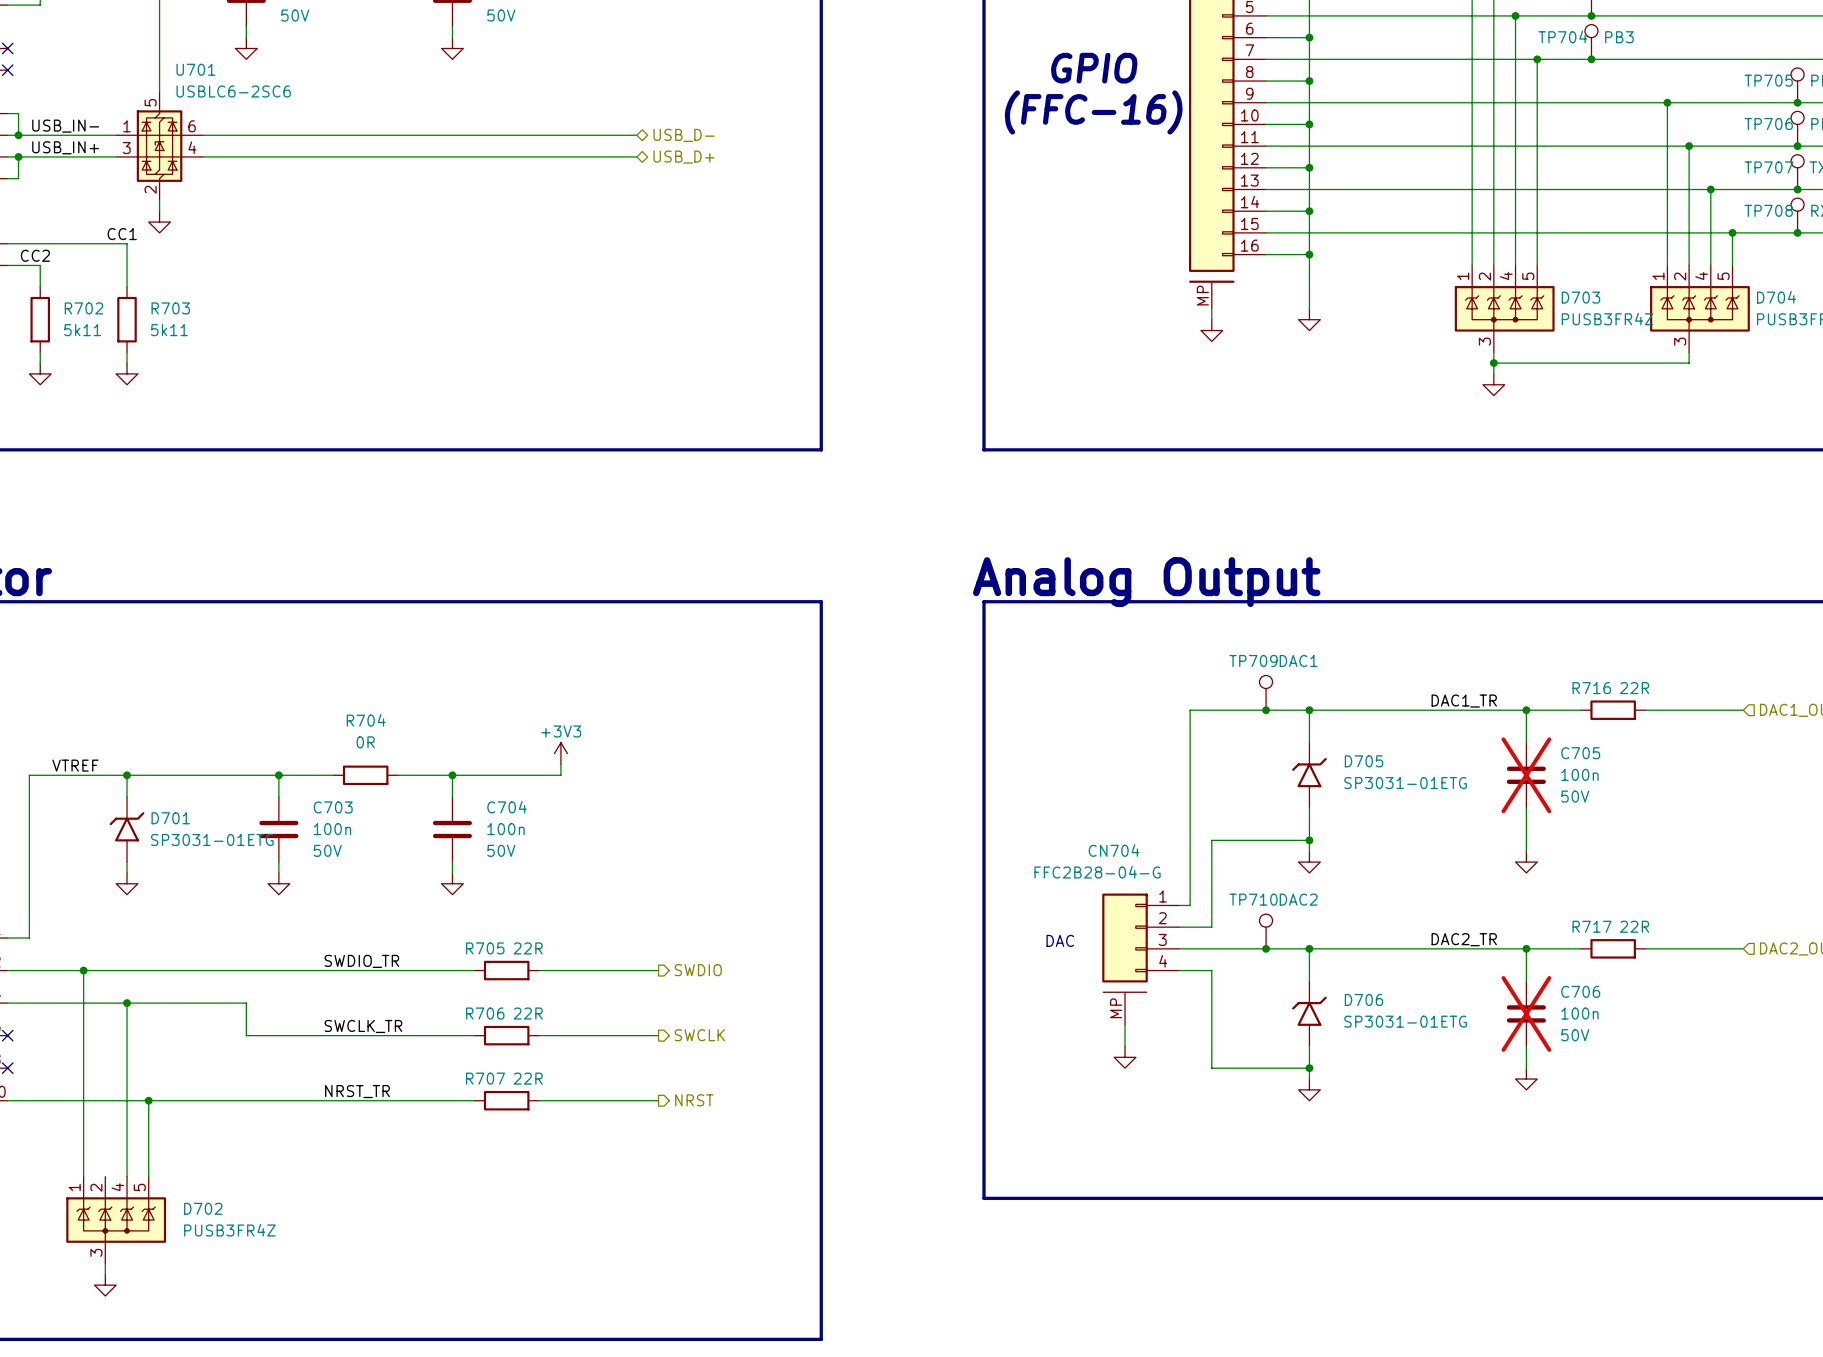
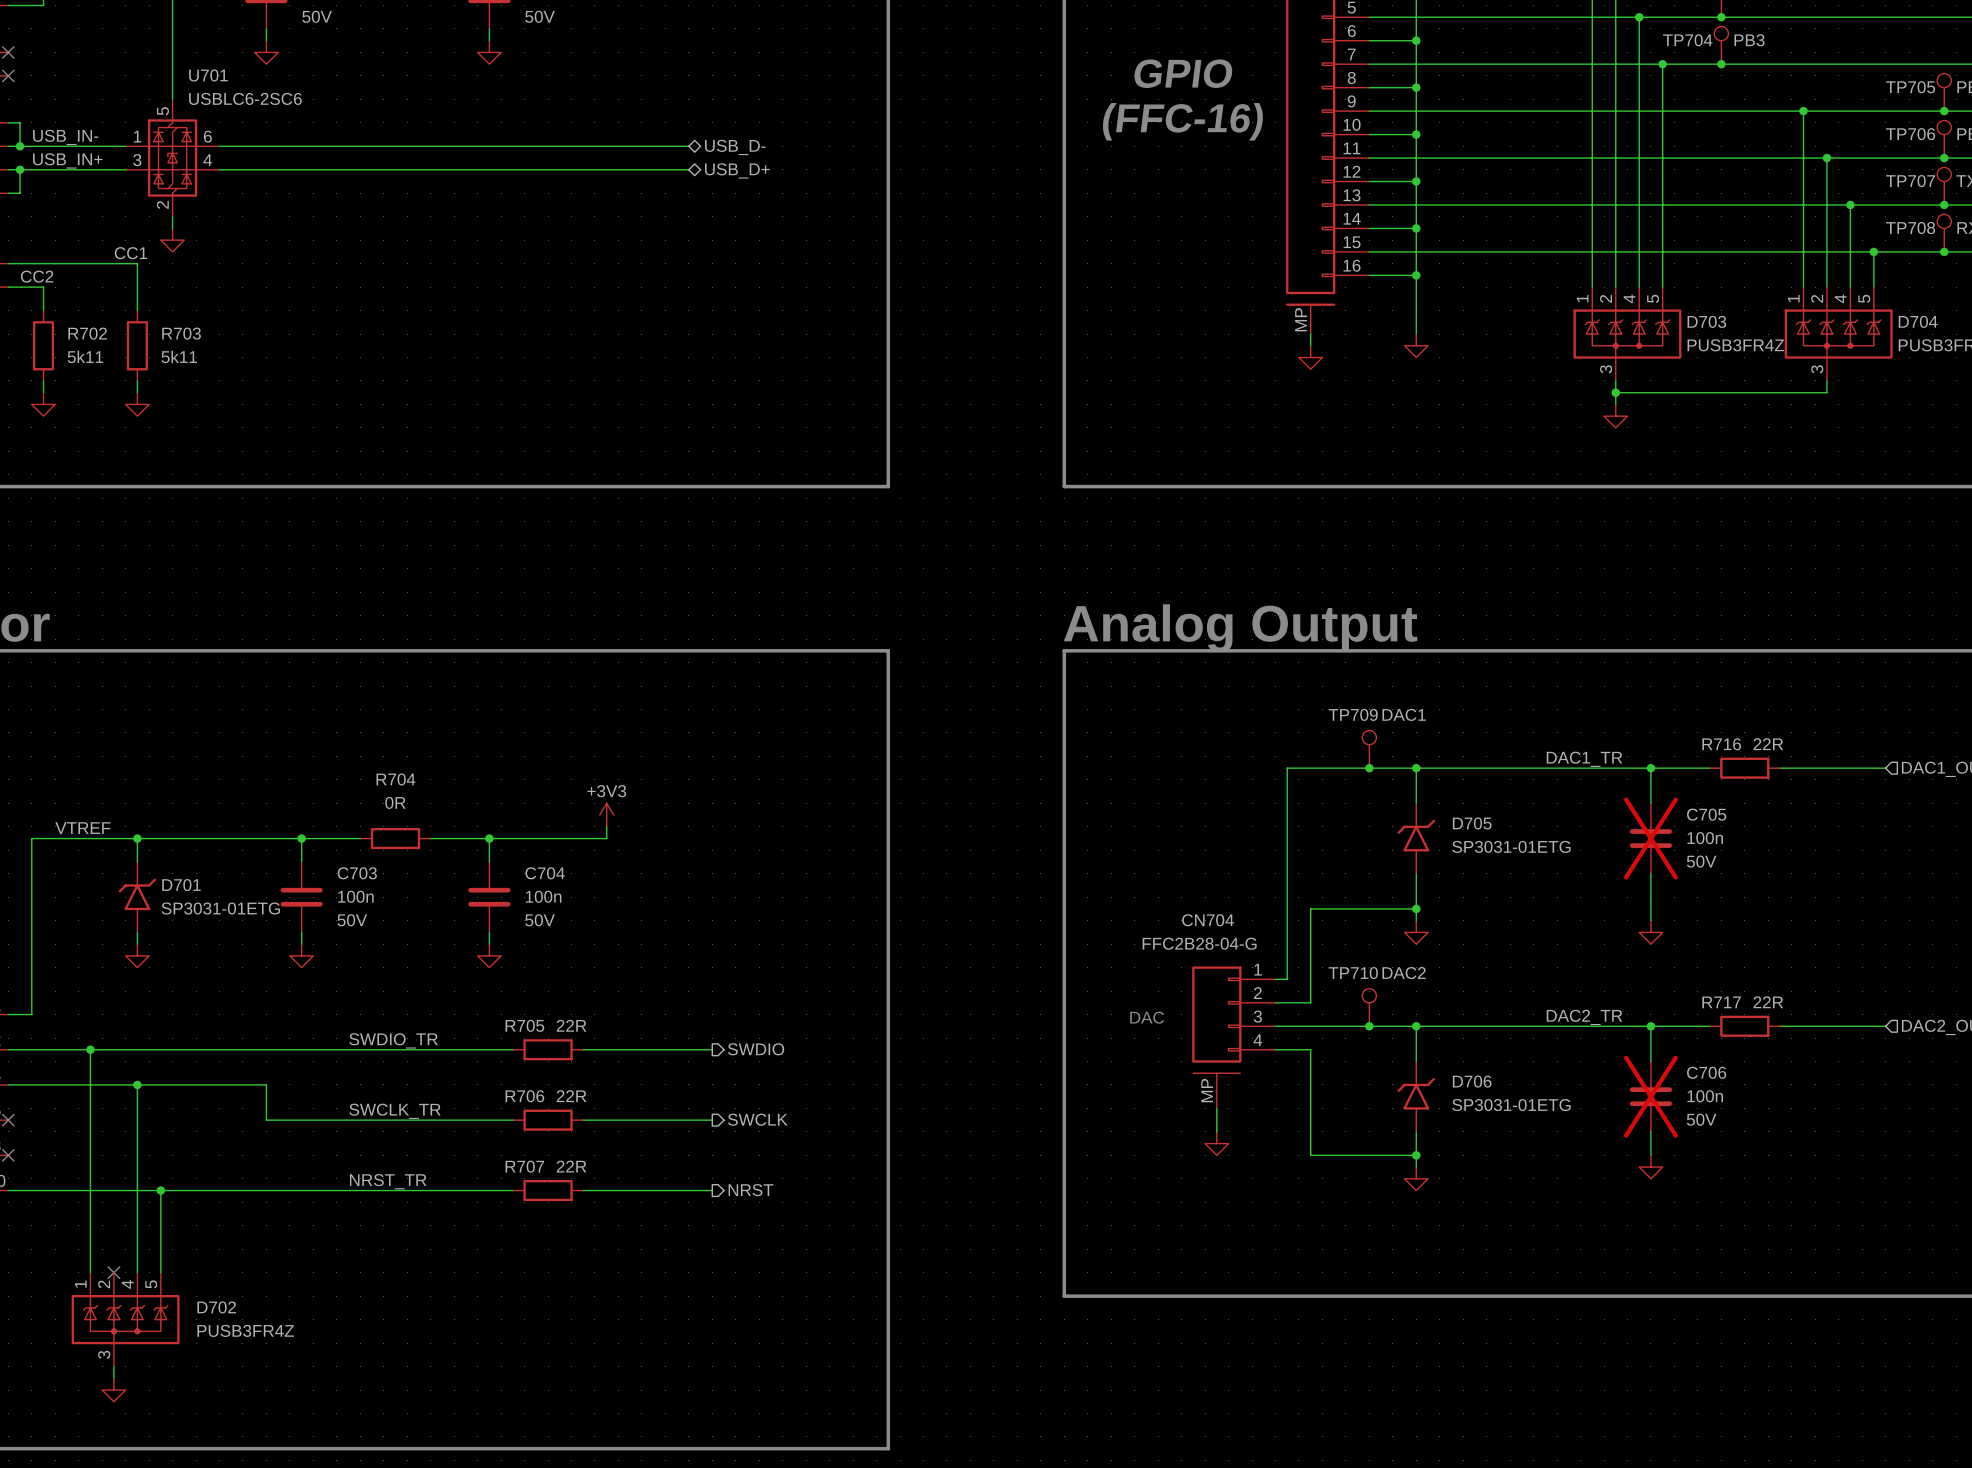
line: none -> (108, 1266) (119, 1278)
line: none -> (119, 1266) (108, 1278)

